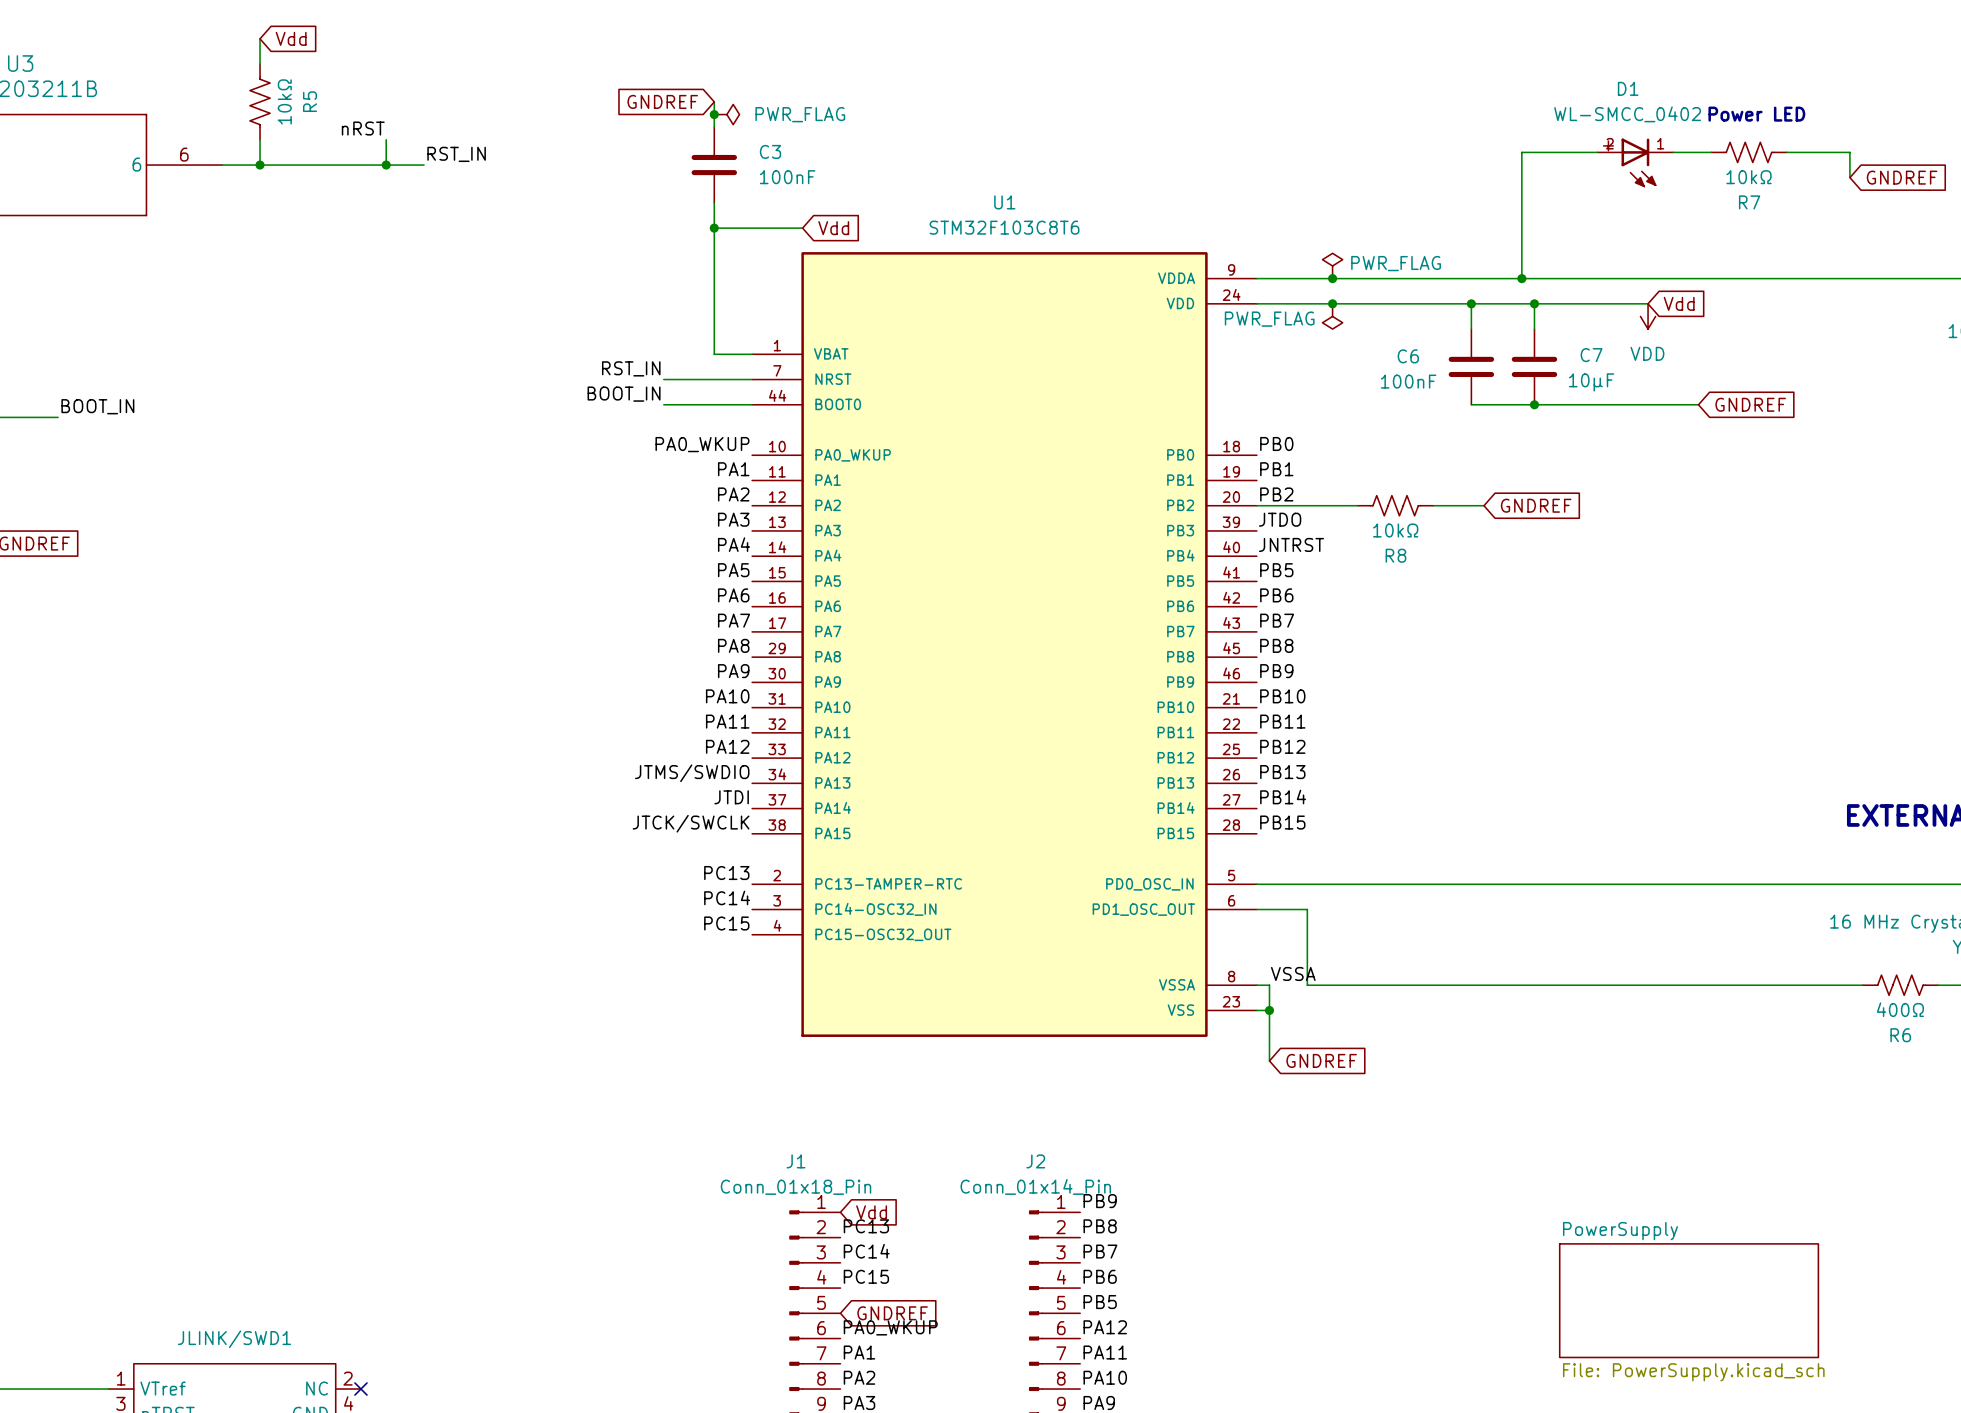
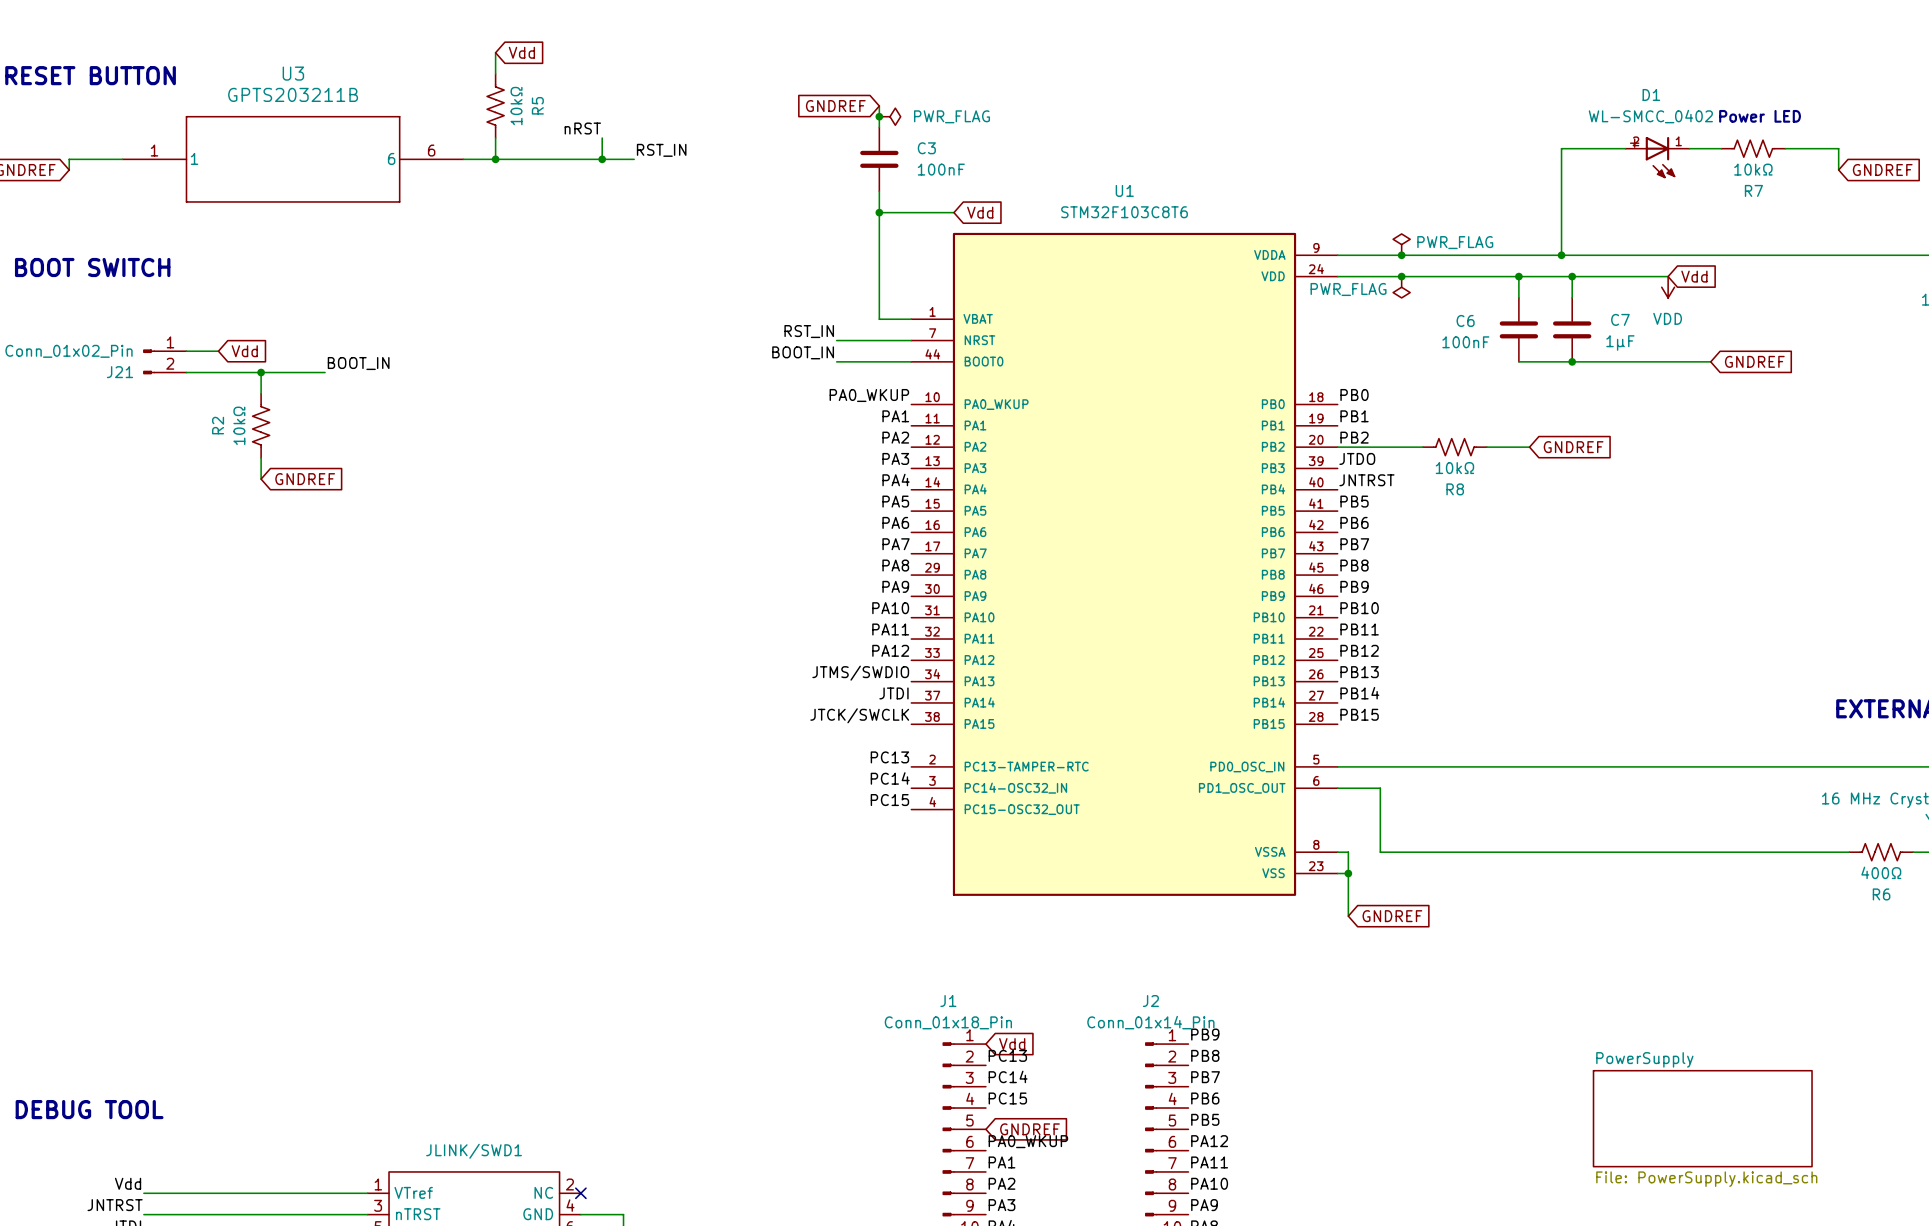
C7 value: 10μF (1591, 382) -> 1μF (1620, 342)
label: VSSA (1293, 973) -> none

